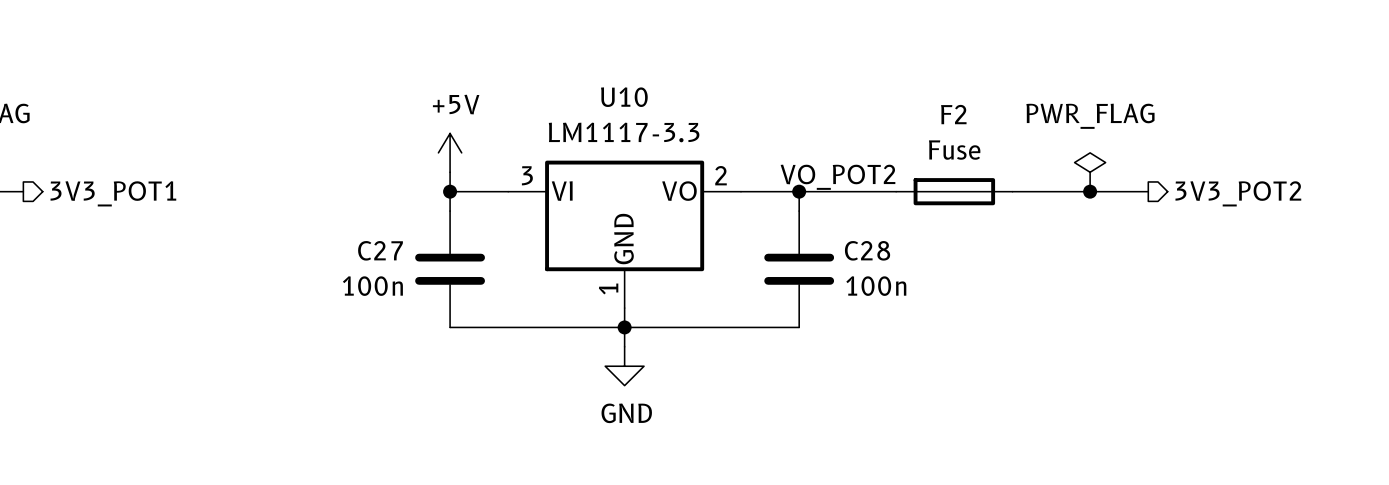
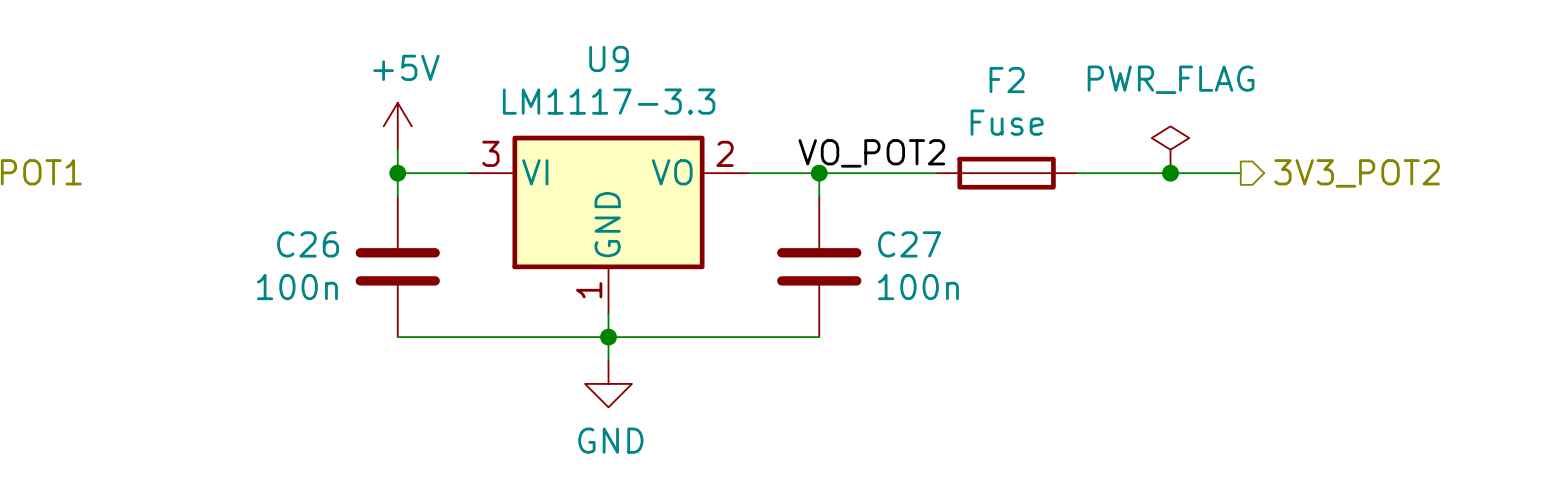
U10 name: U10 (624, 97) -> U9 (609, 58)
C27 name: C27 (380, 250) -> C26 (308, 244)
C28 name: C28 (867, 250) -> C27 (909, 244)

